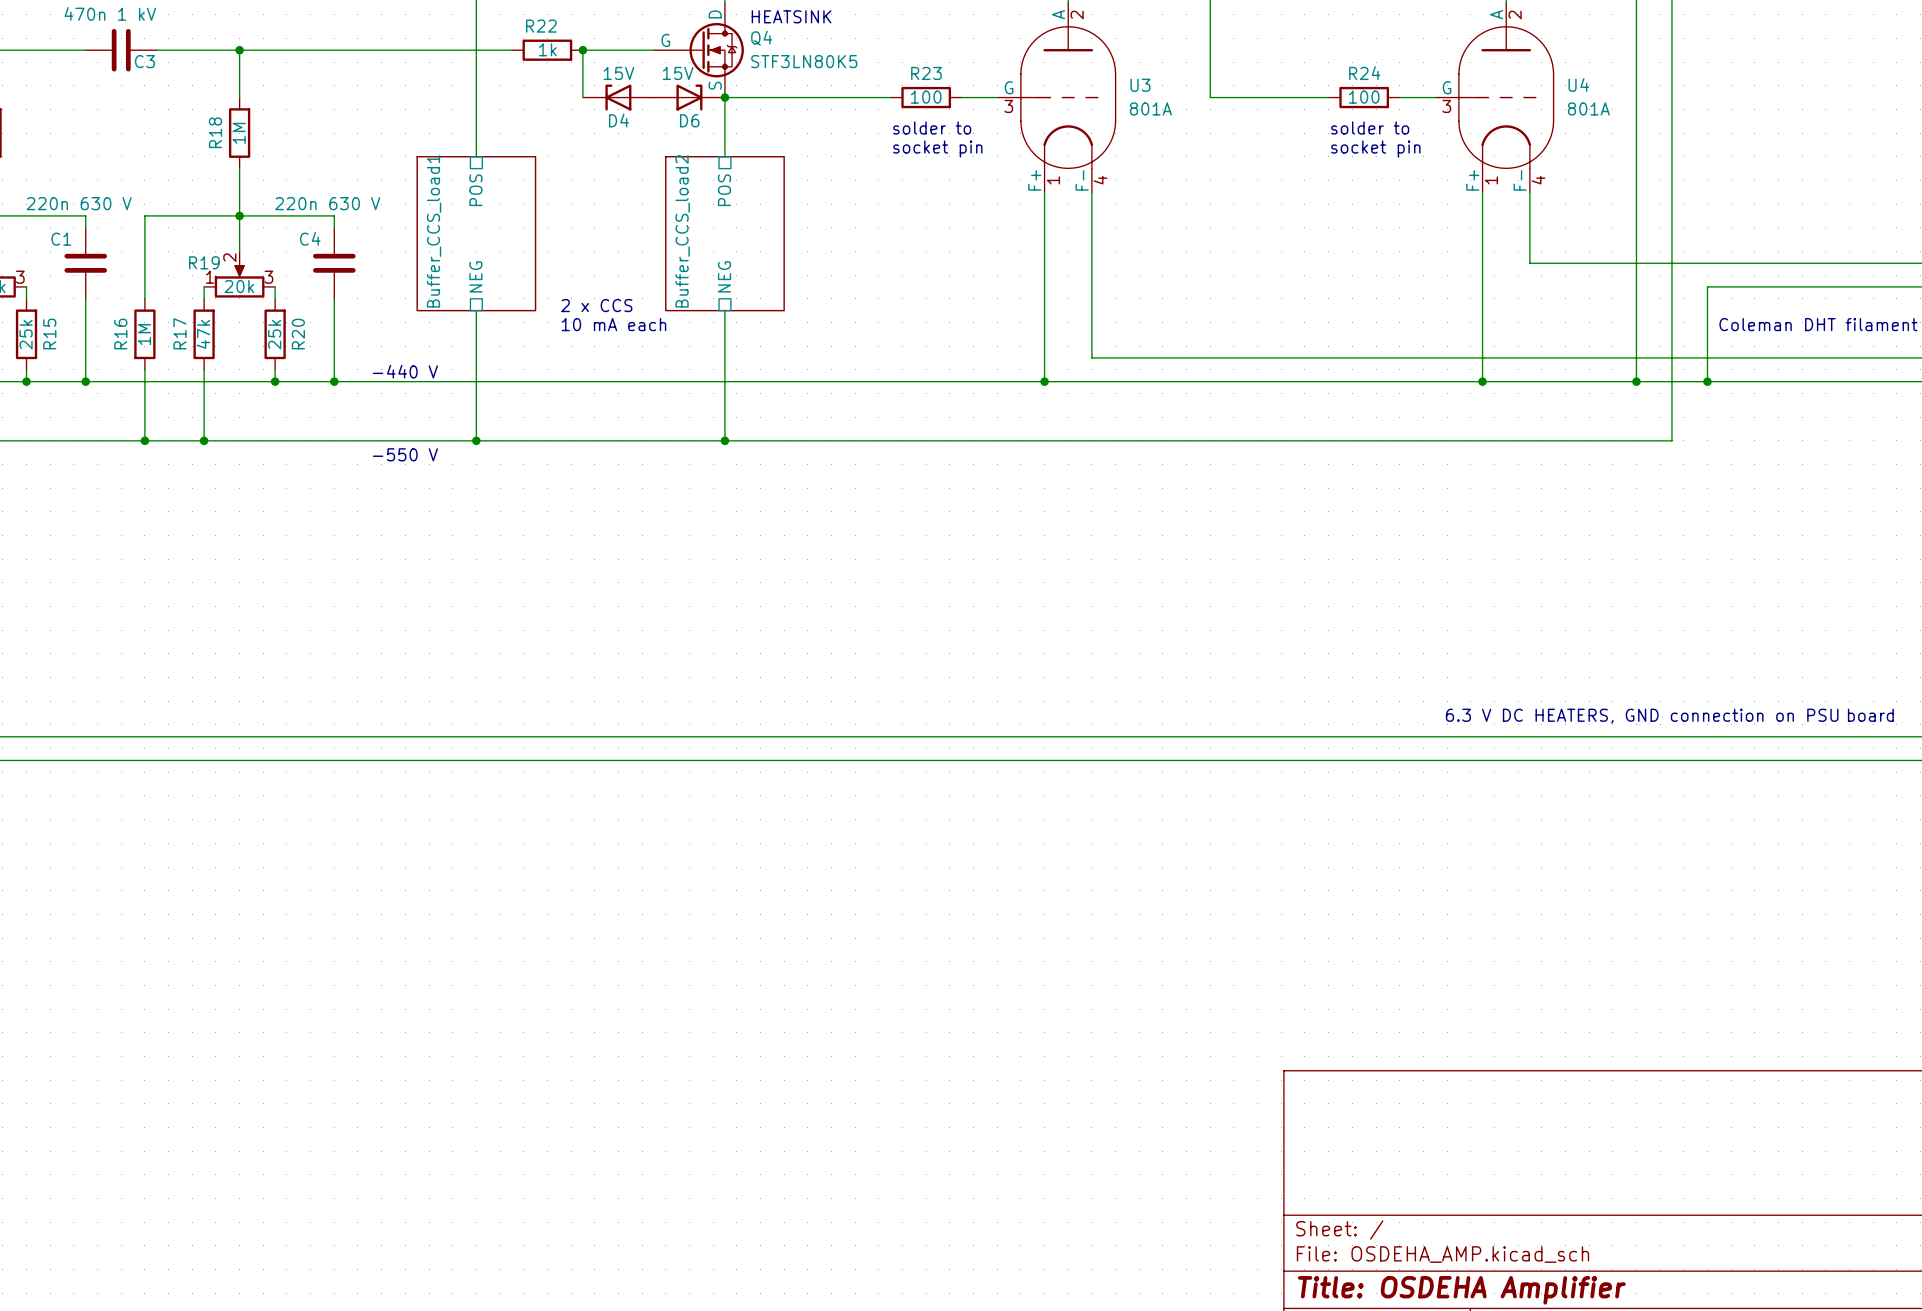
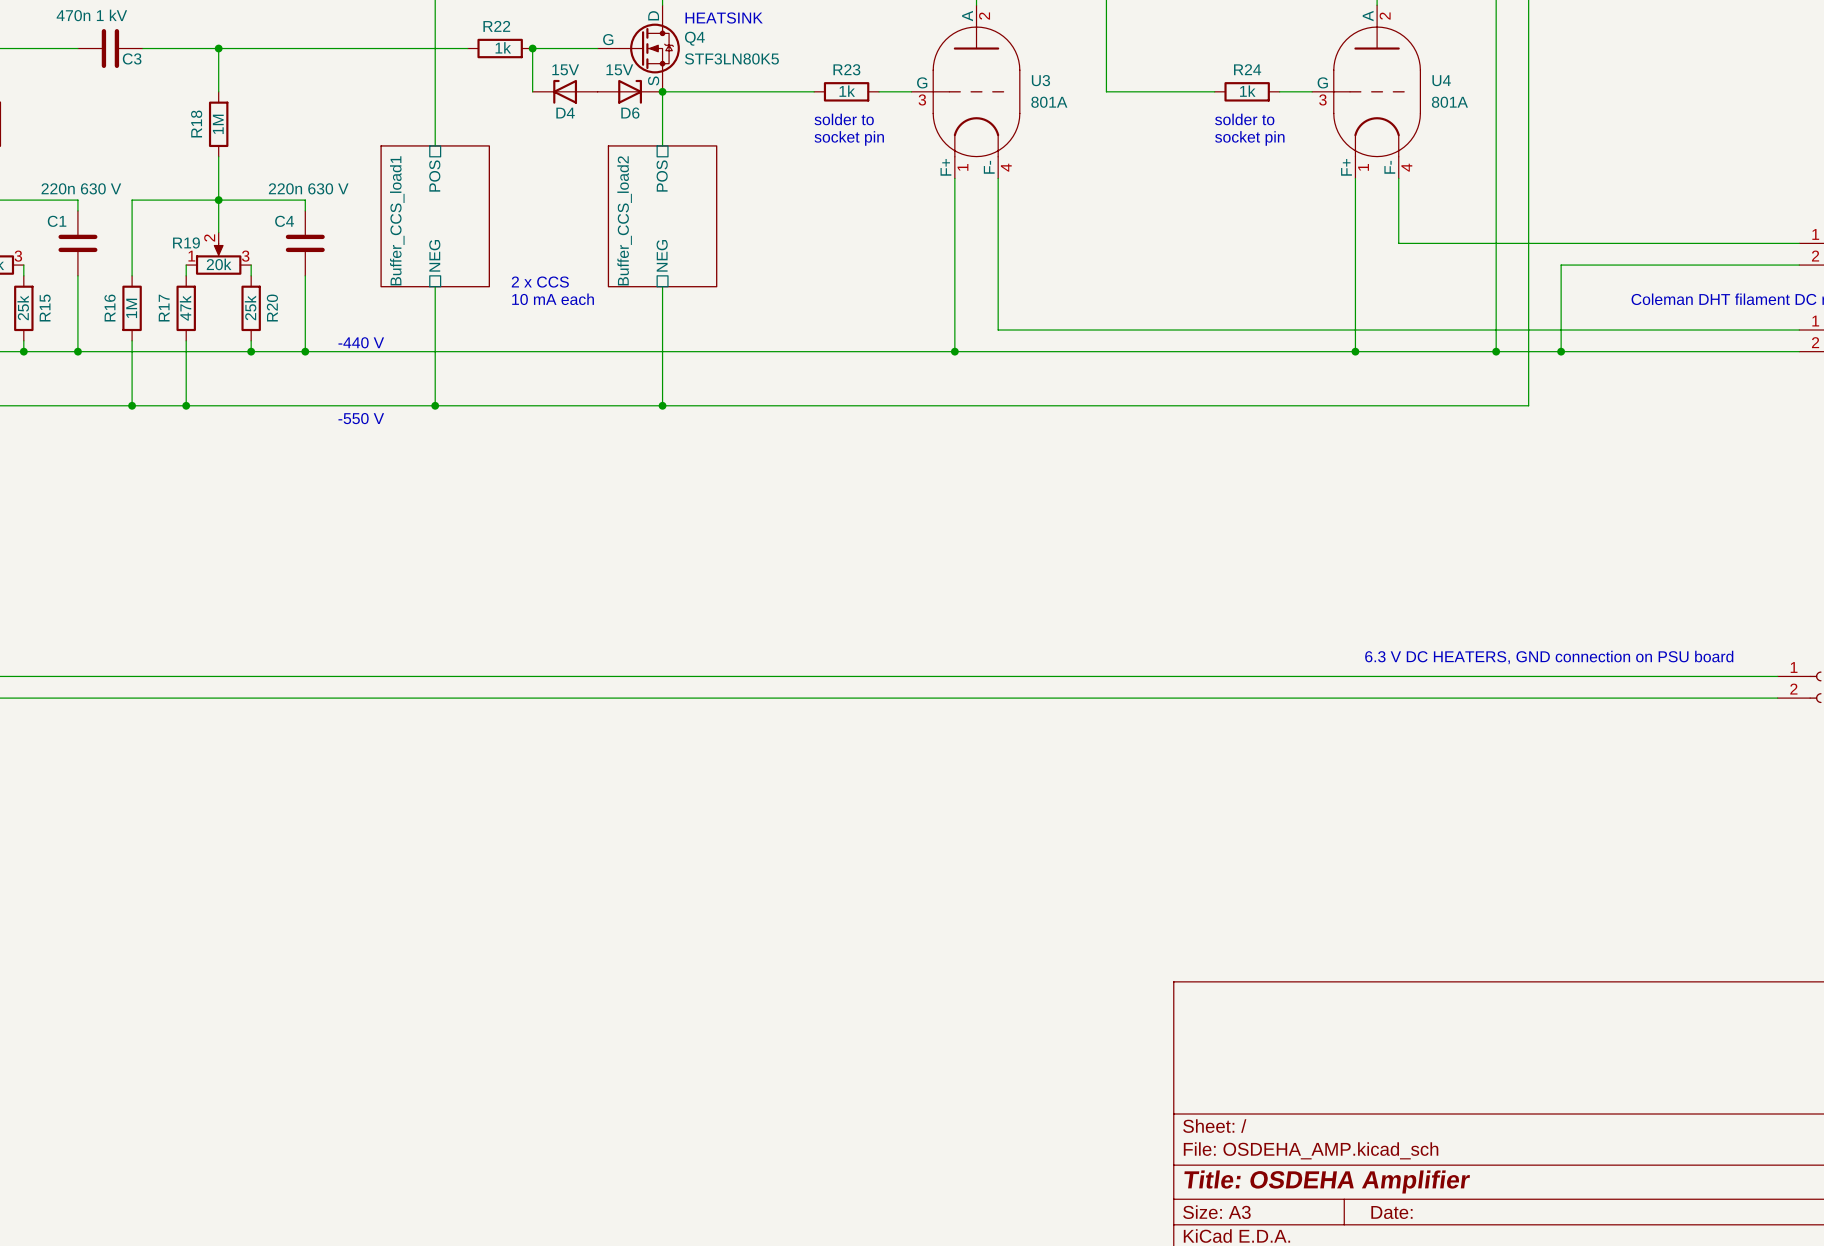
R23 value: 100 (926, 97) -> 1k (847, 91)
R24 value: 100 (1364, 97) -> 1k (1247, 91)

